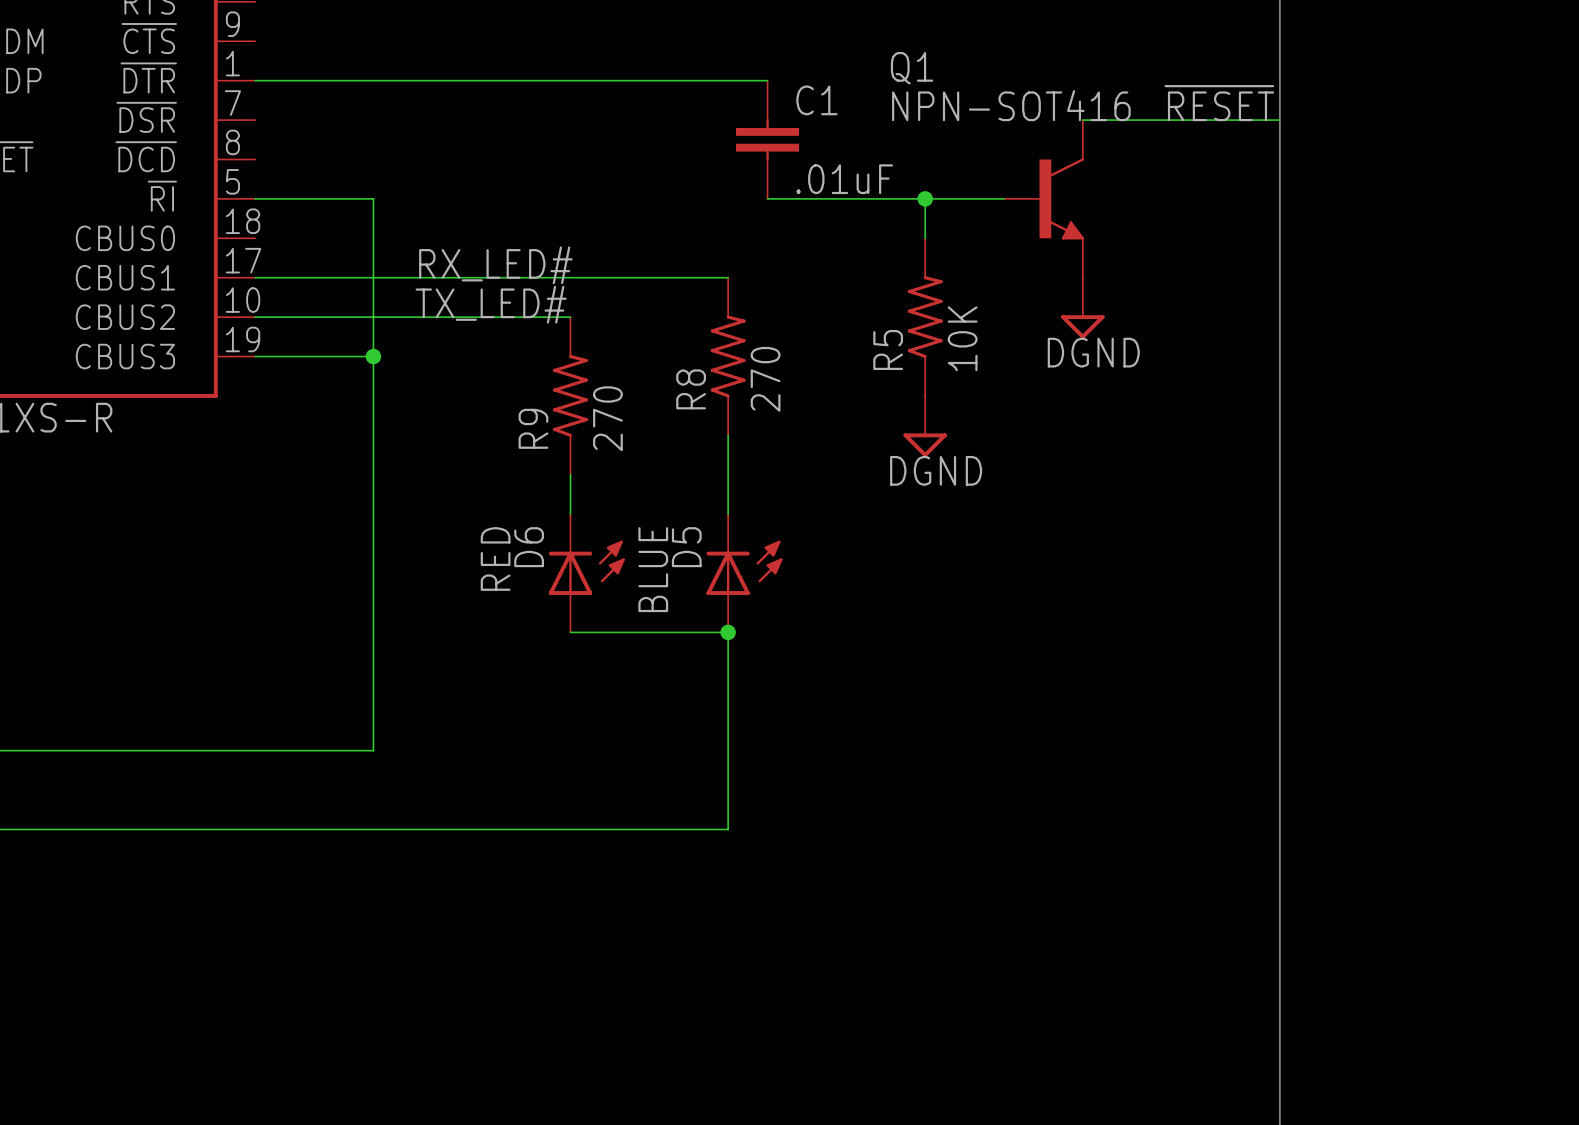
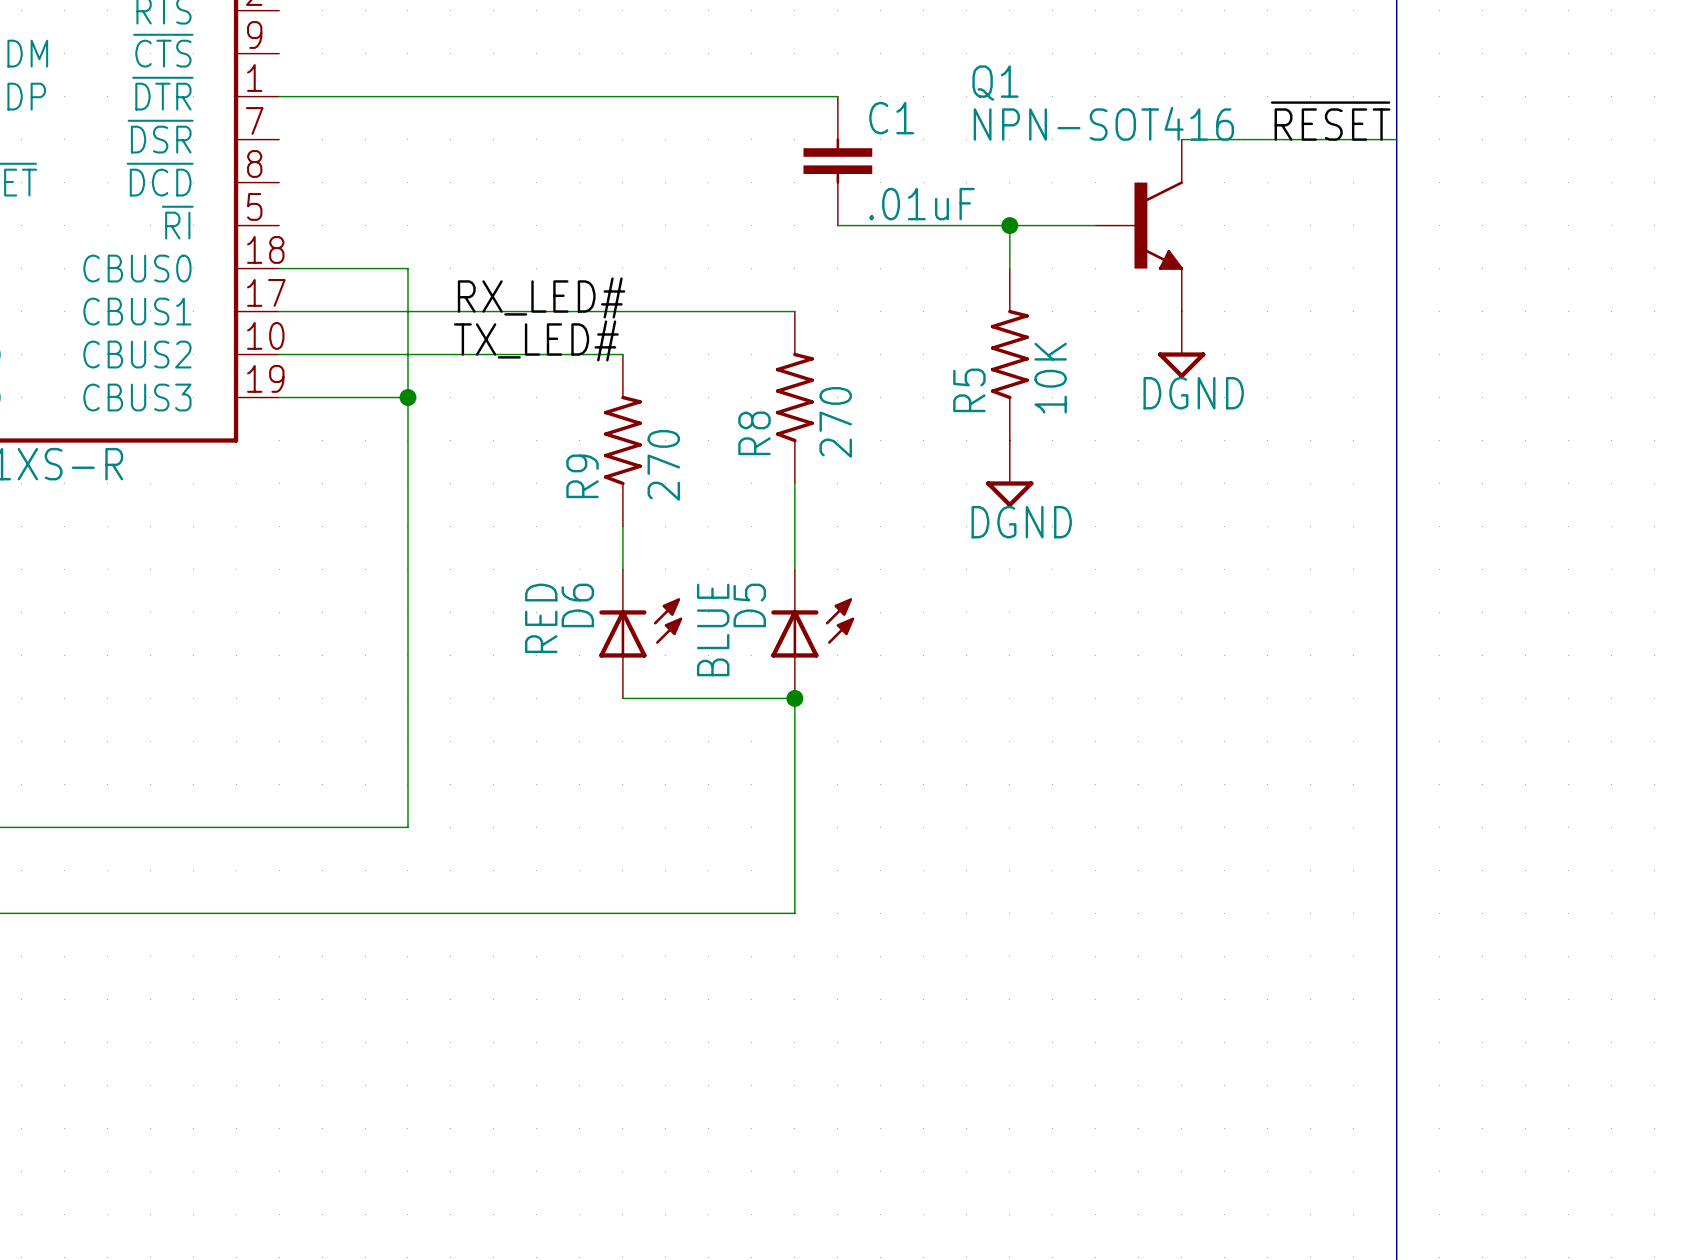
wire: (255, 198) (373, 198) (373, 238) -> (279, 268) (407, 268)

